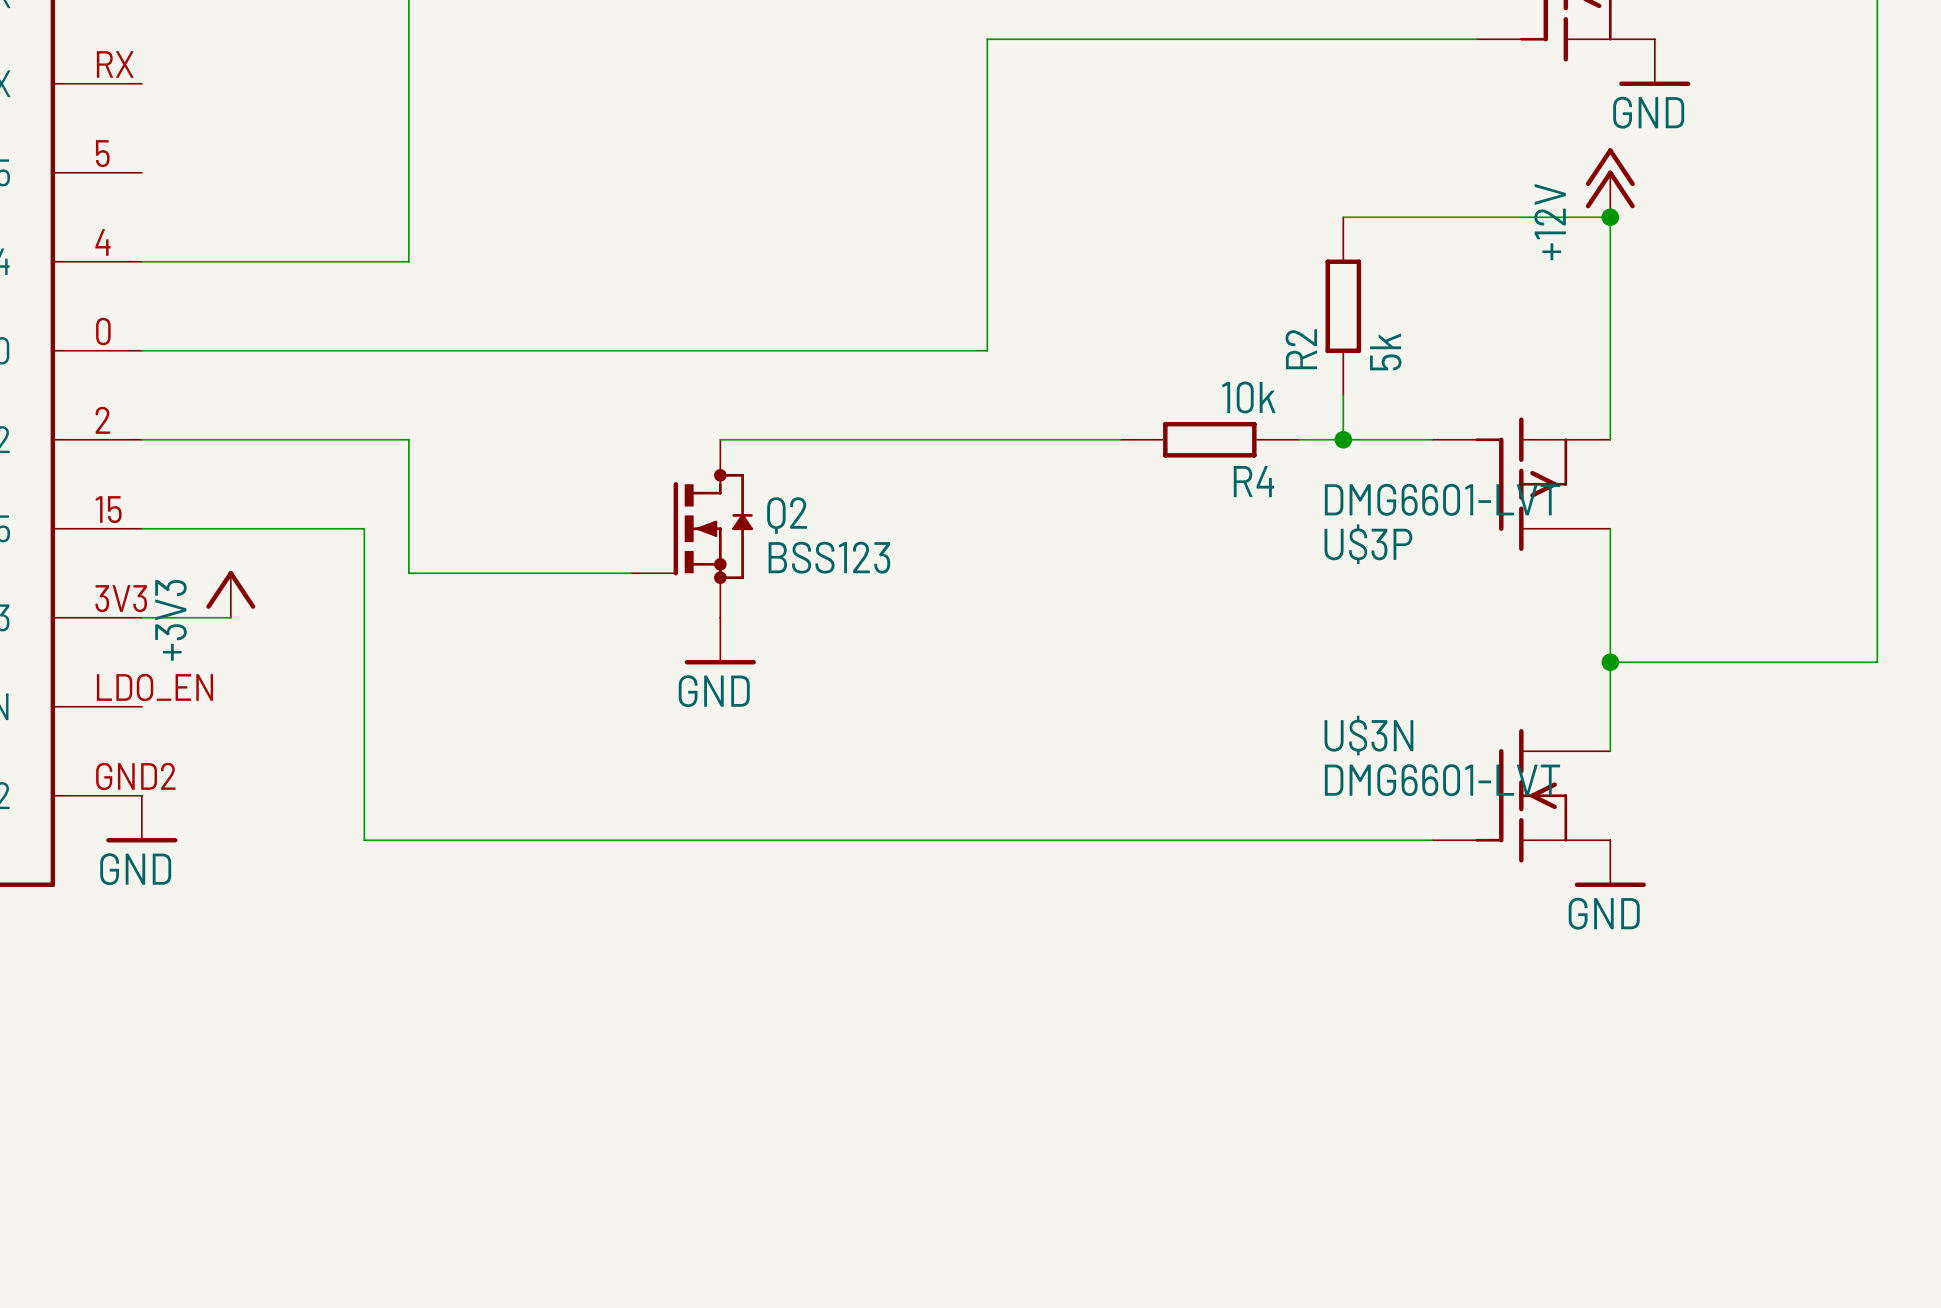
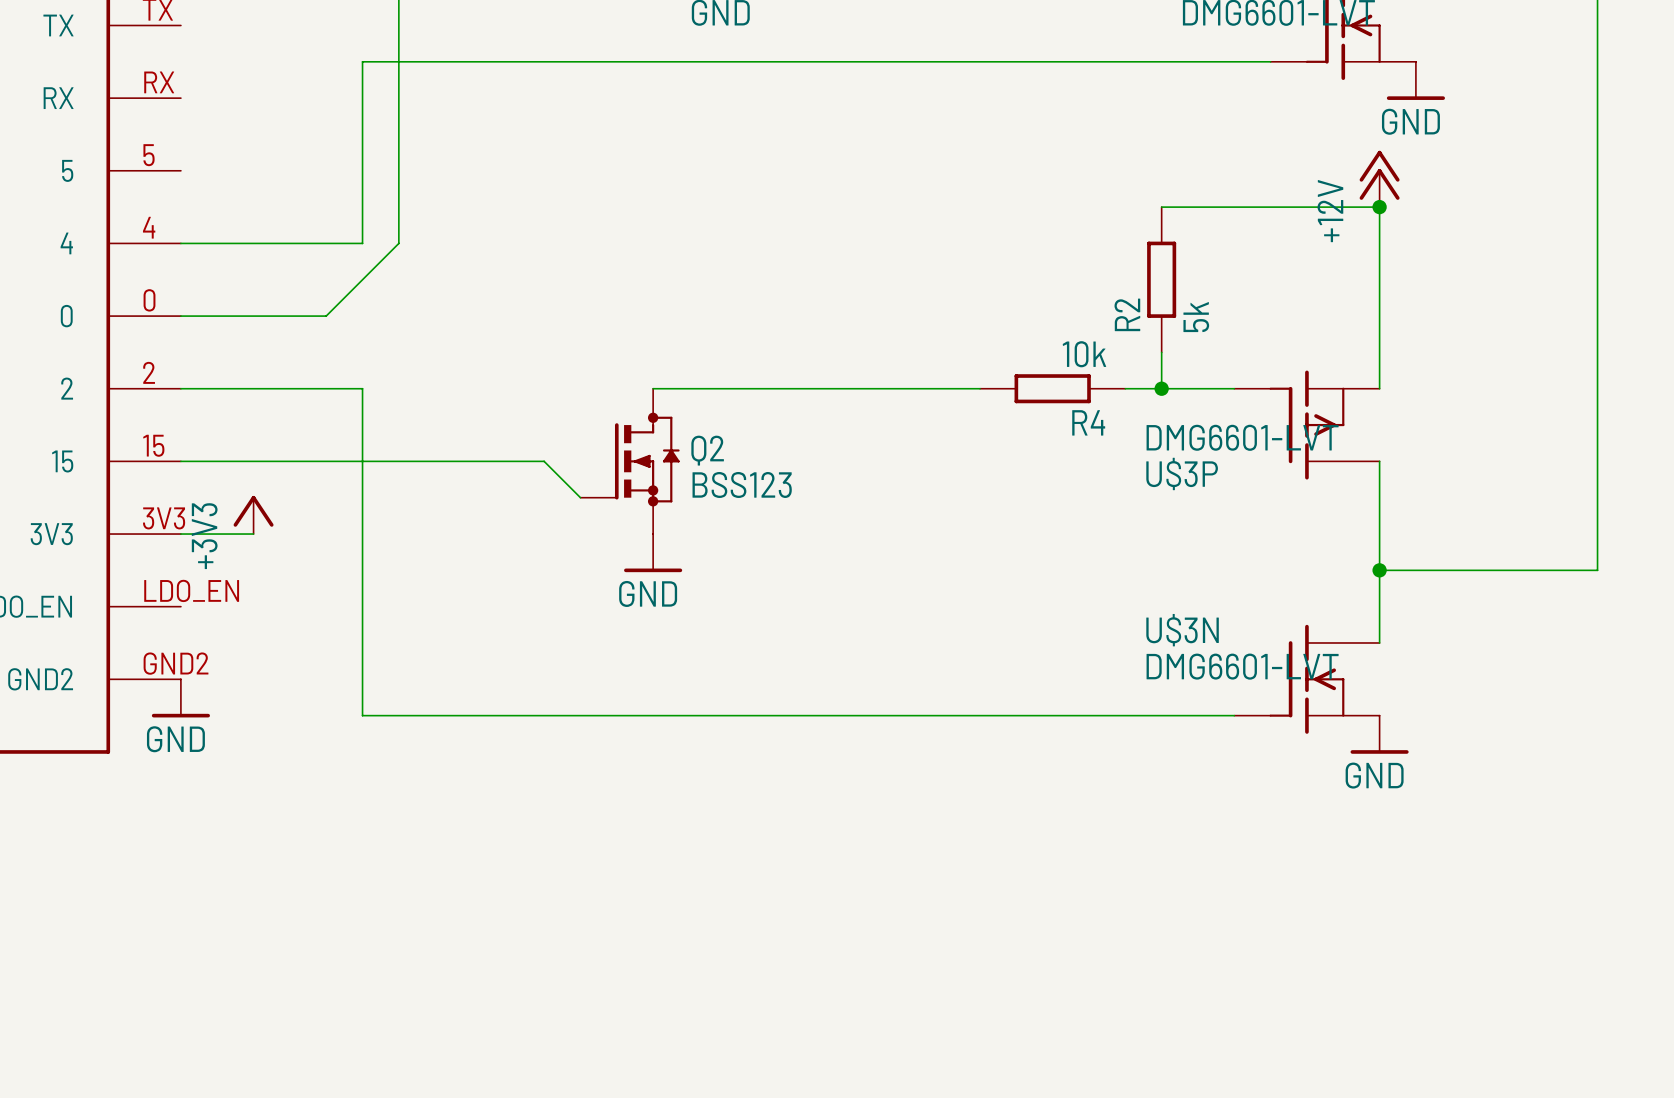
wire: (987, 39) (987, 350) (319, 350) -> (871, 61) (362, 61) (362, 243)
wire: (364, 261) (408, 261) -> (326, 316) (398, 243)
wire: (364, 439) (408, 439) (408, 573) (631, 573) -> (362, 388) (362, 461) (544, 461) (580, 497)

